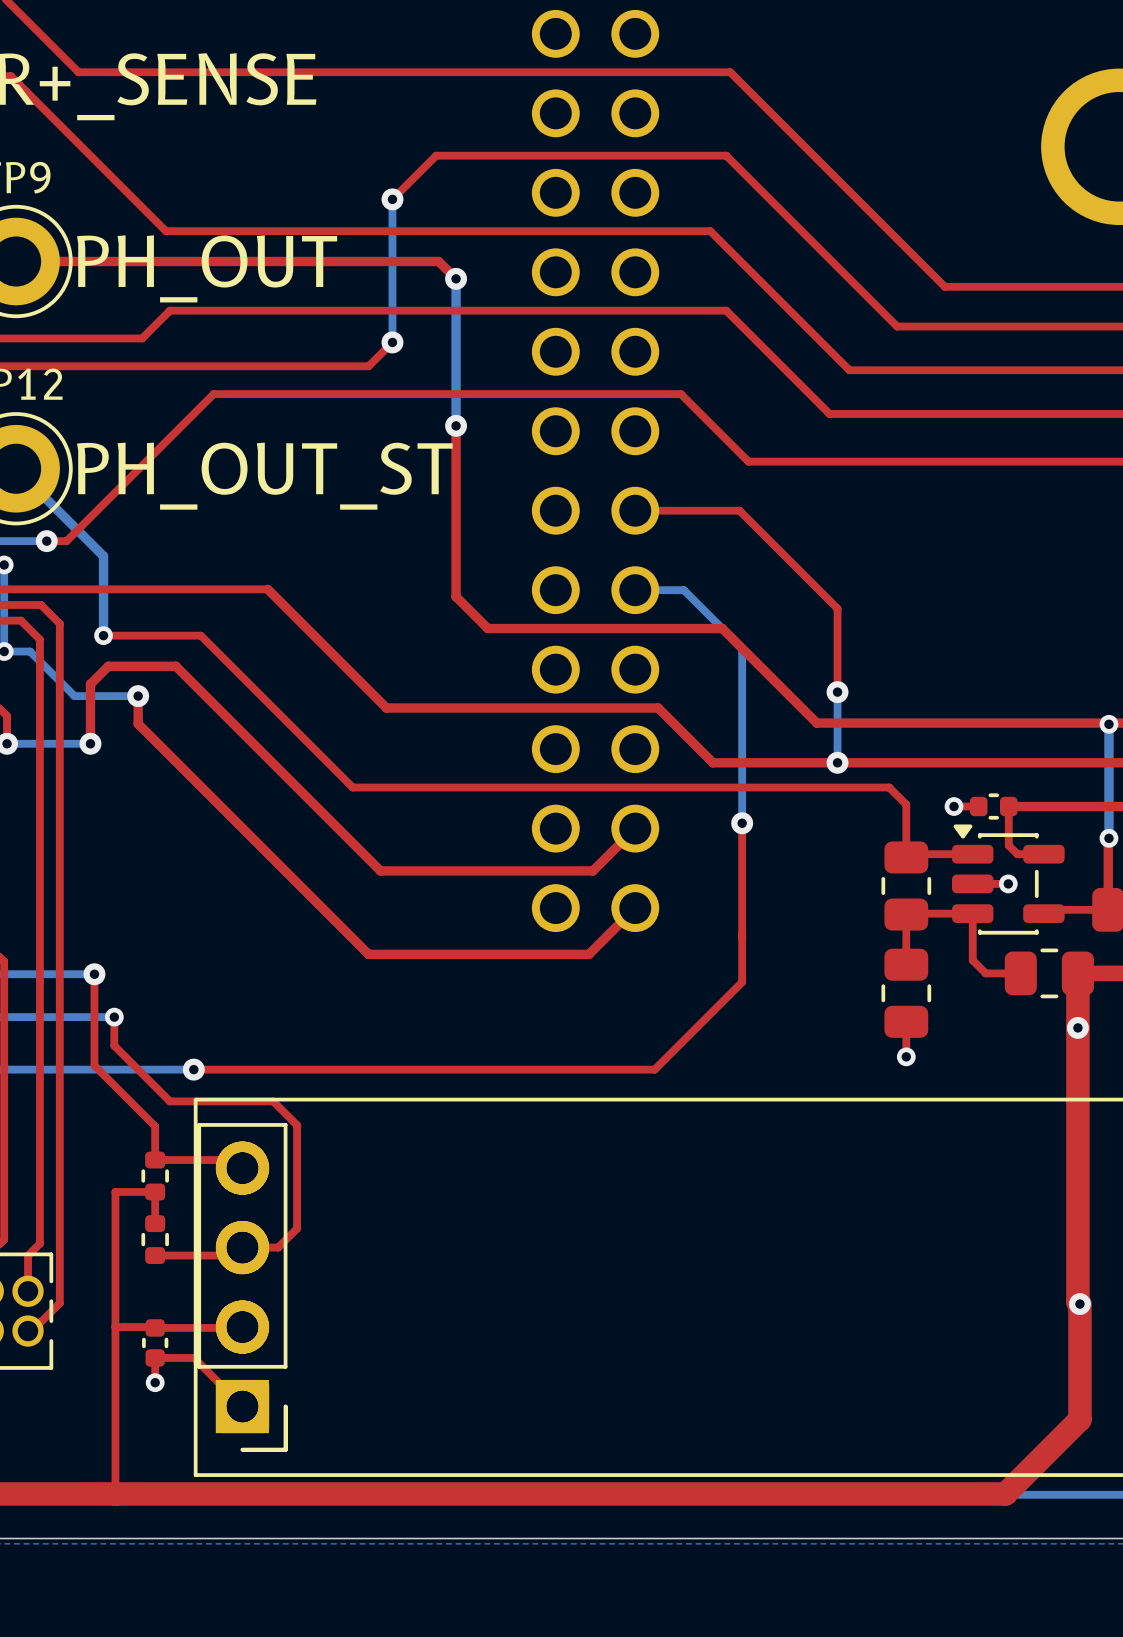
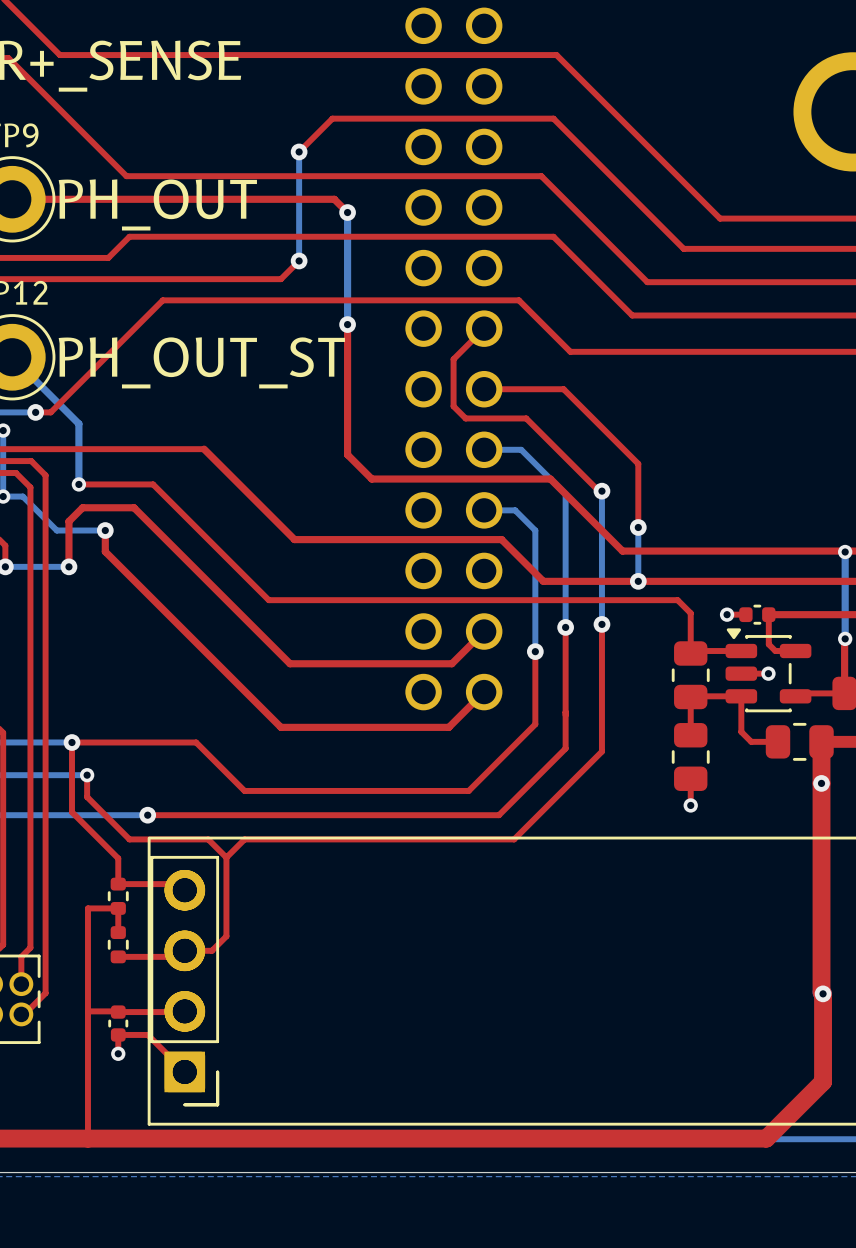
top track: none -> (484, 328) (453, 359) (453, 406) (465, 418) (526, 418) (598, 491) (601, 491)
bottom track: none -> (601, 491) (601, 624)
via: none -> (601, 491)
bottom track: none -> (484, 510) (515, 510) (535, 530) (535, 651)
top track: none -> (601, 624) (601, 751) (514, 839) (244, 839) (226, 857)
via: none -> (601, 624)
top track: none -> (535, 651) (535, 724) (468, 790) (244, 790) (196, 742) (71, 742)
via: none -> (535, 651)

